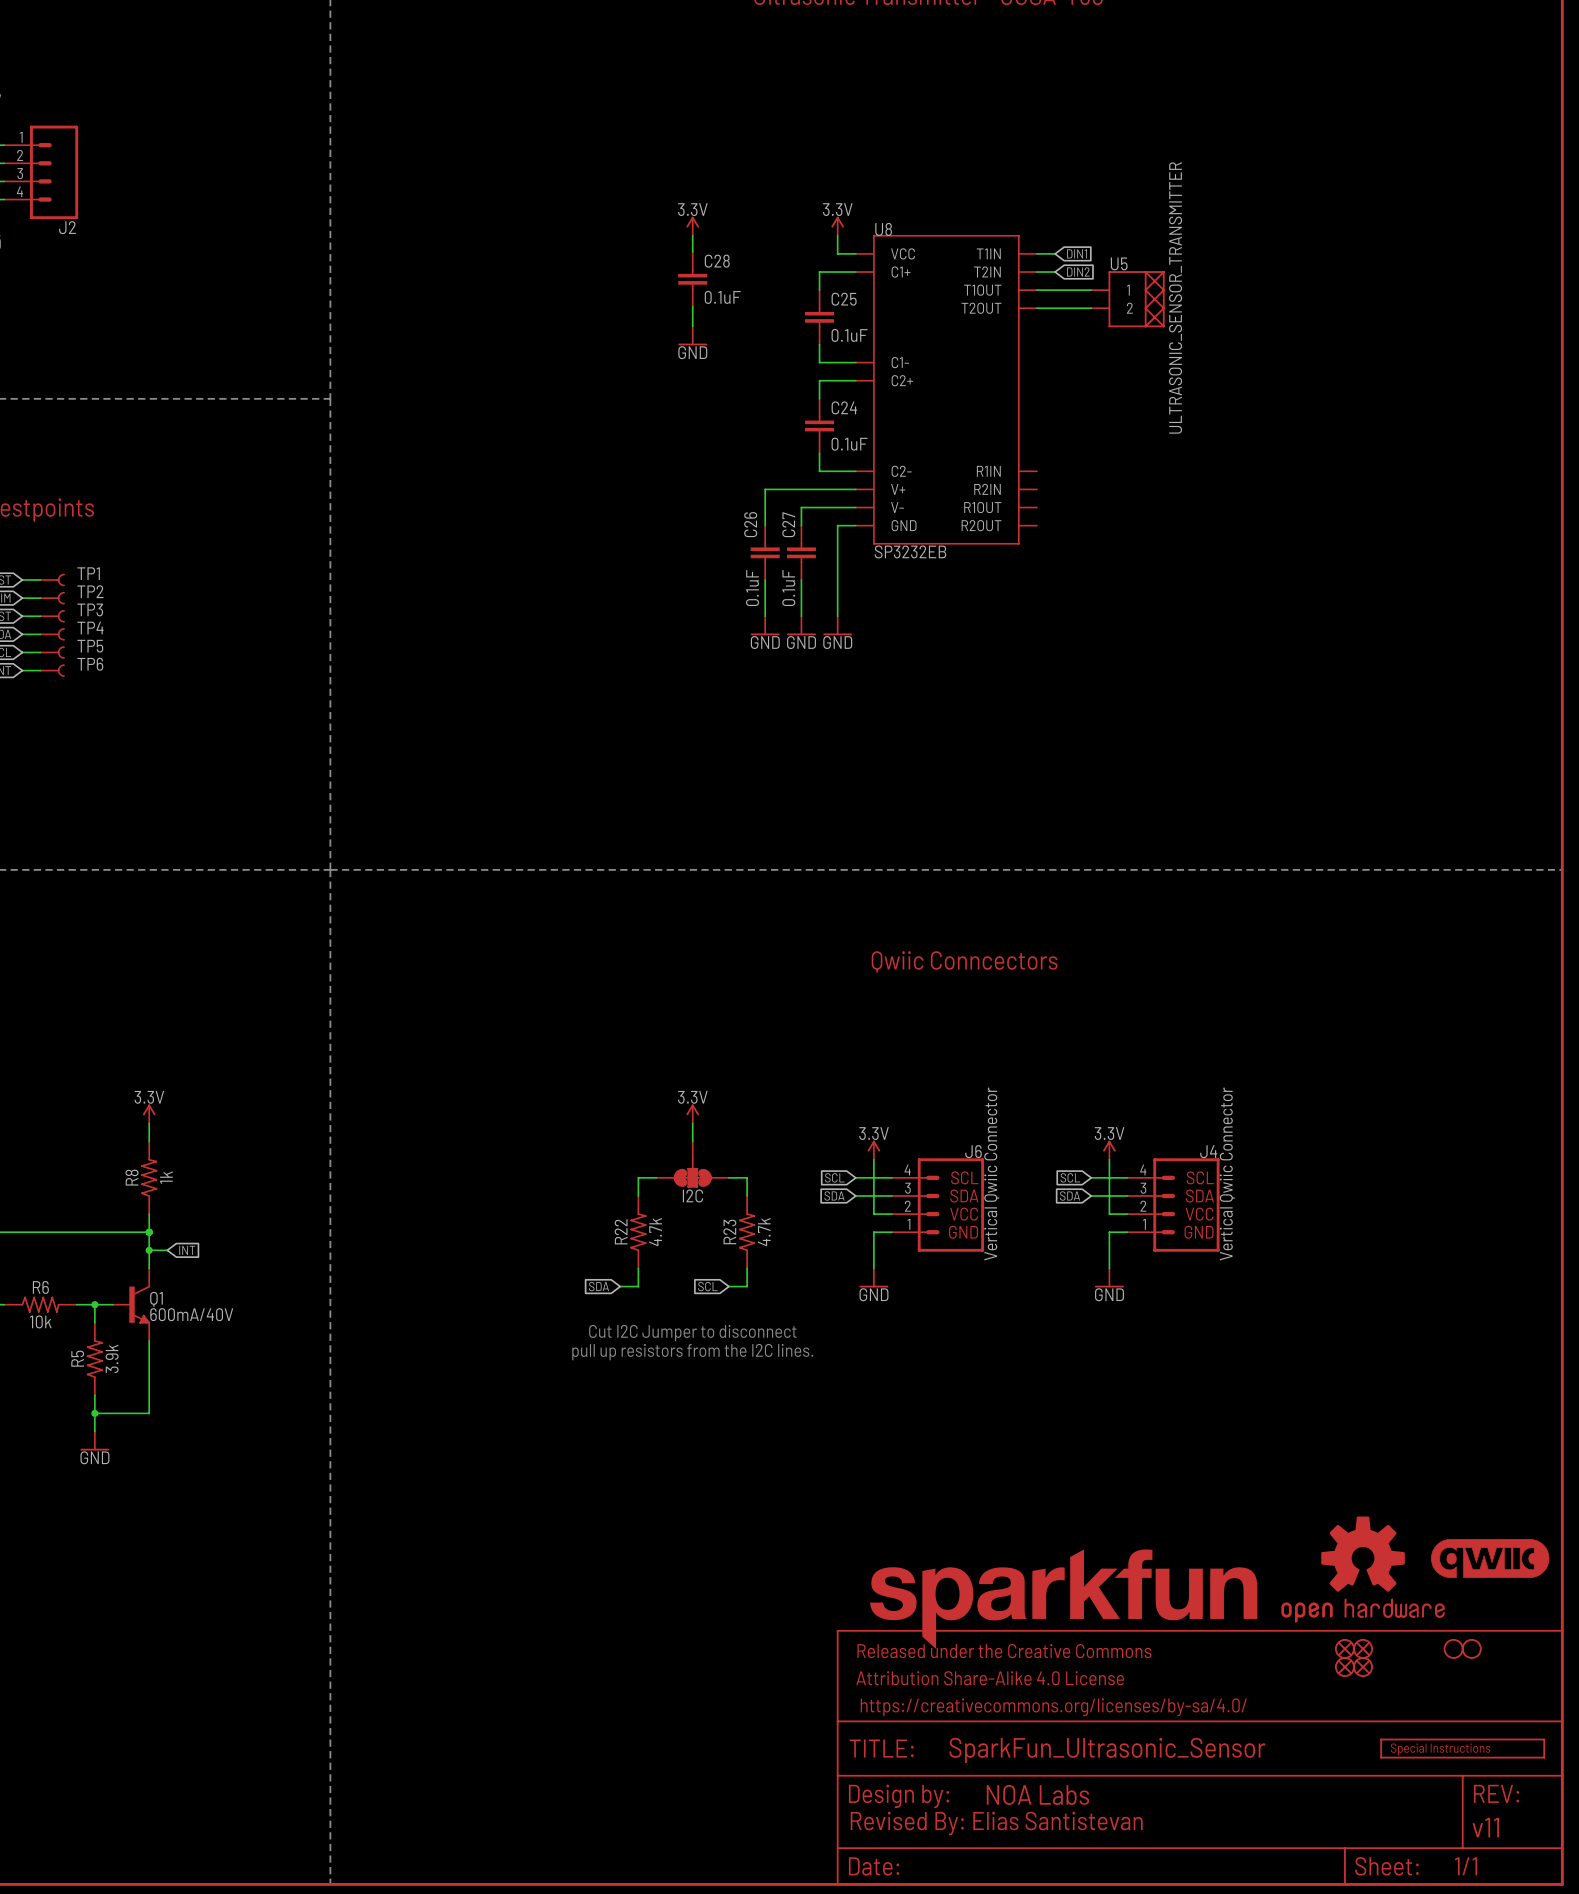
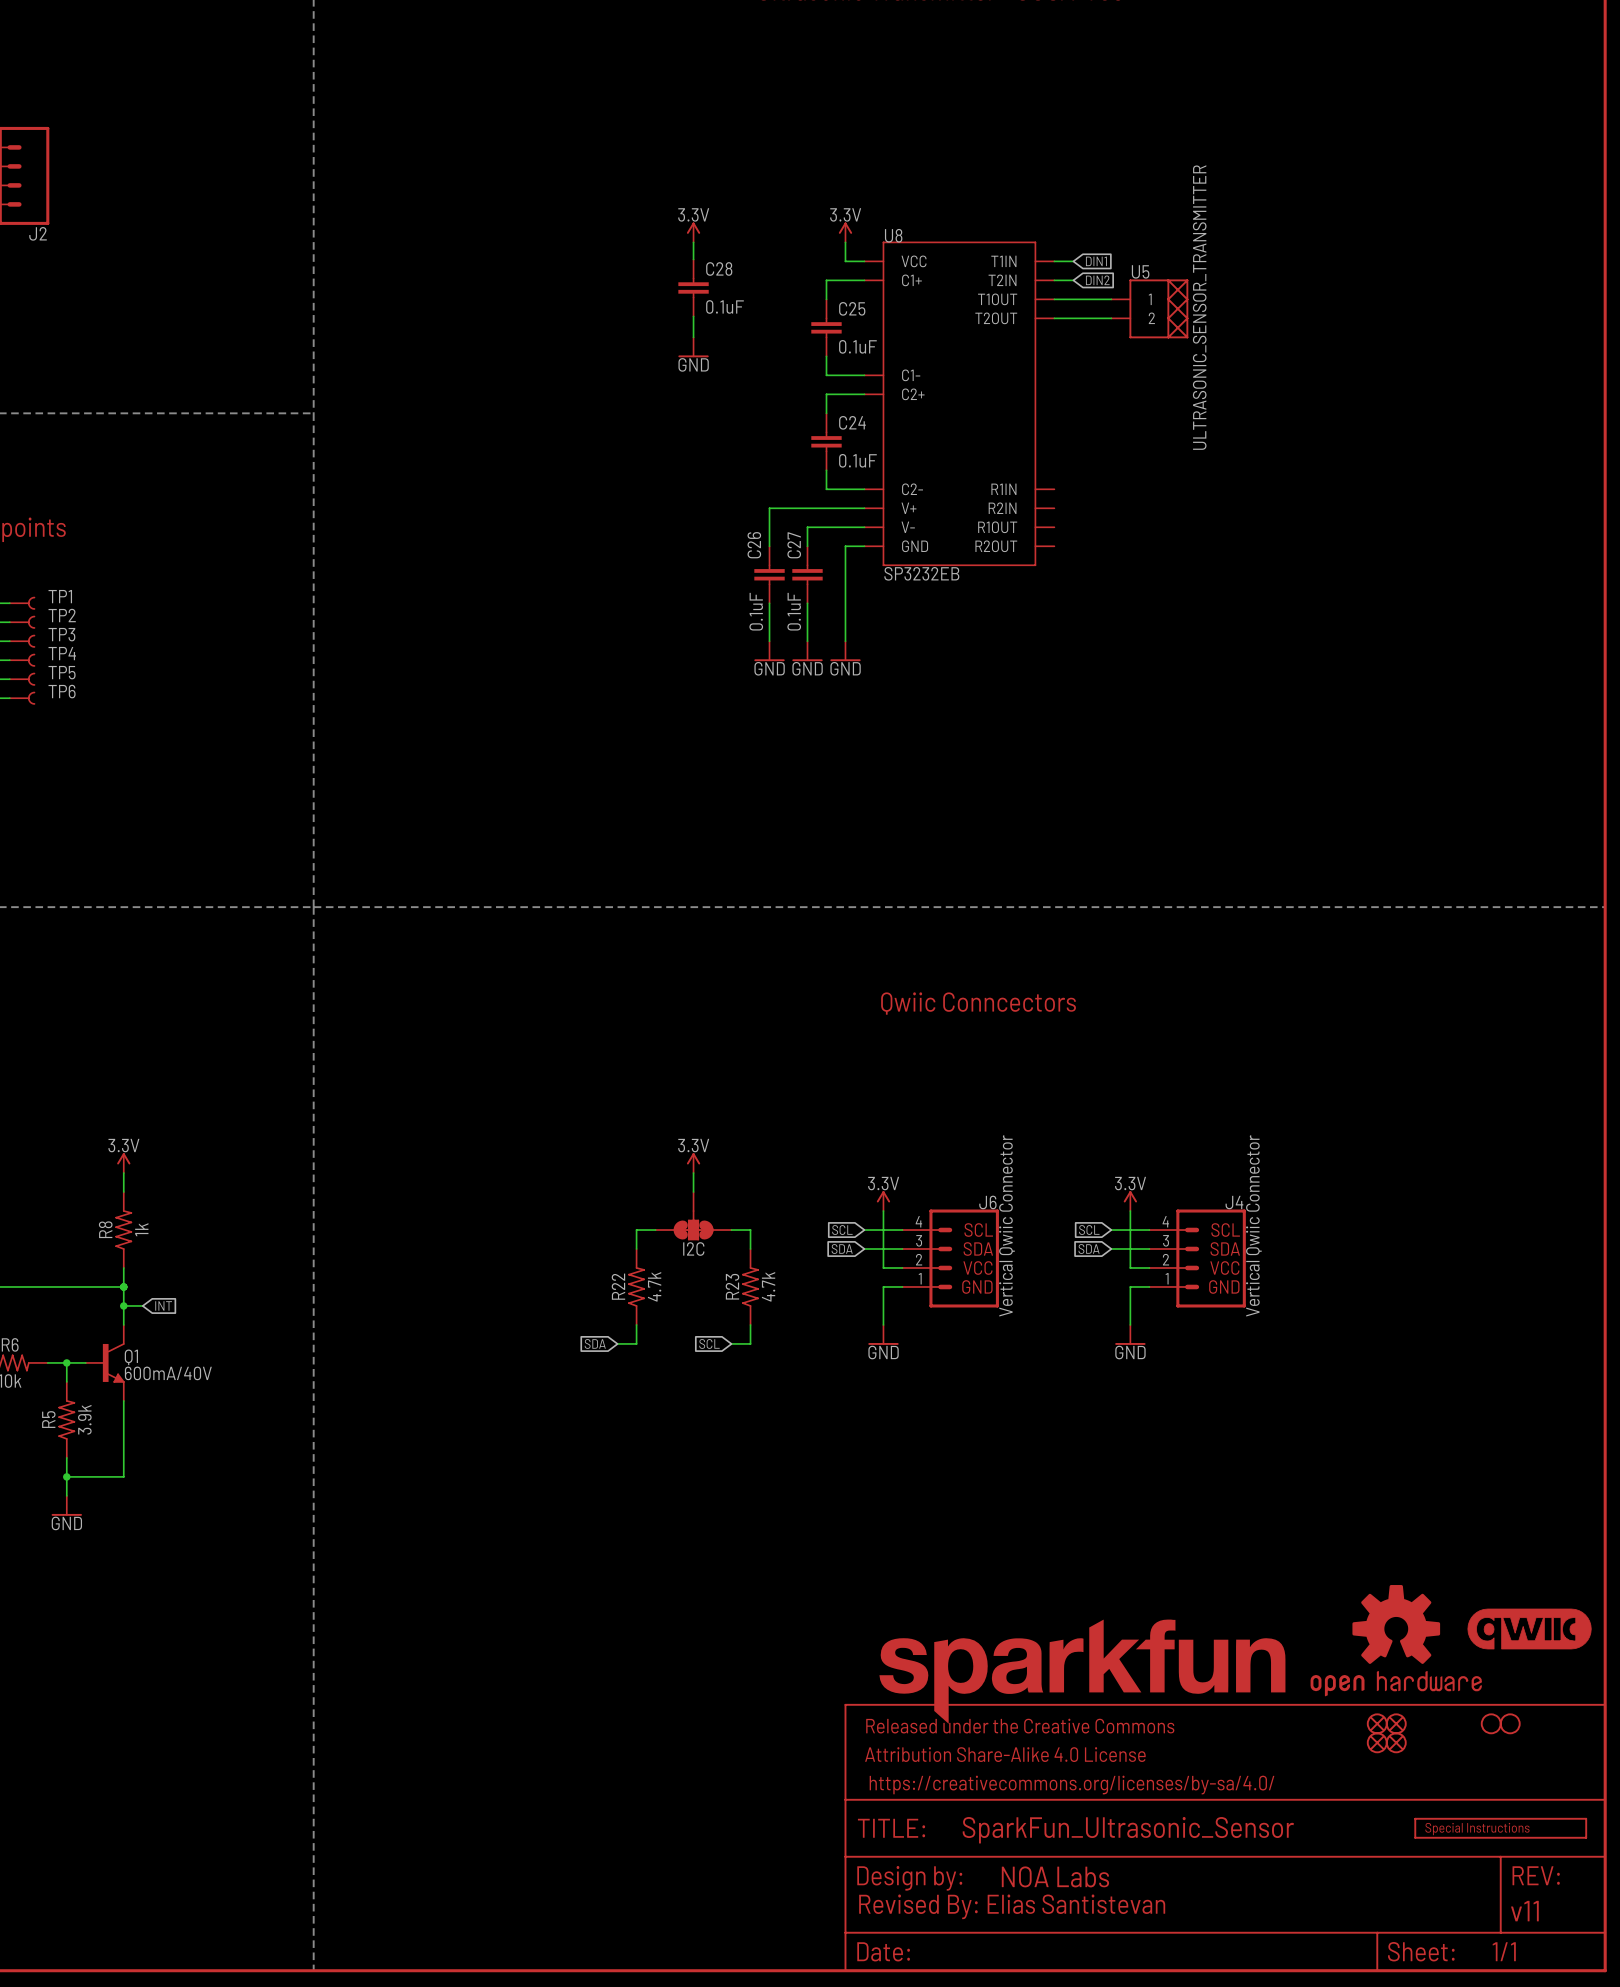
text: Cut I2C Jumper to disconnect (692, 1333) -> none
text: pull up resistors from the I2C lines. (692, 1352) -> none

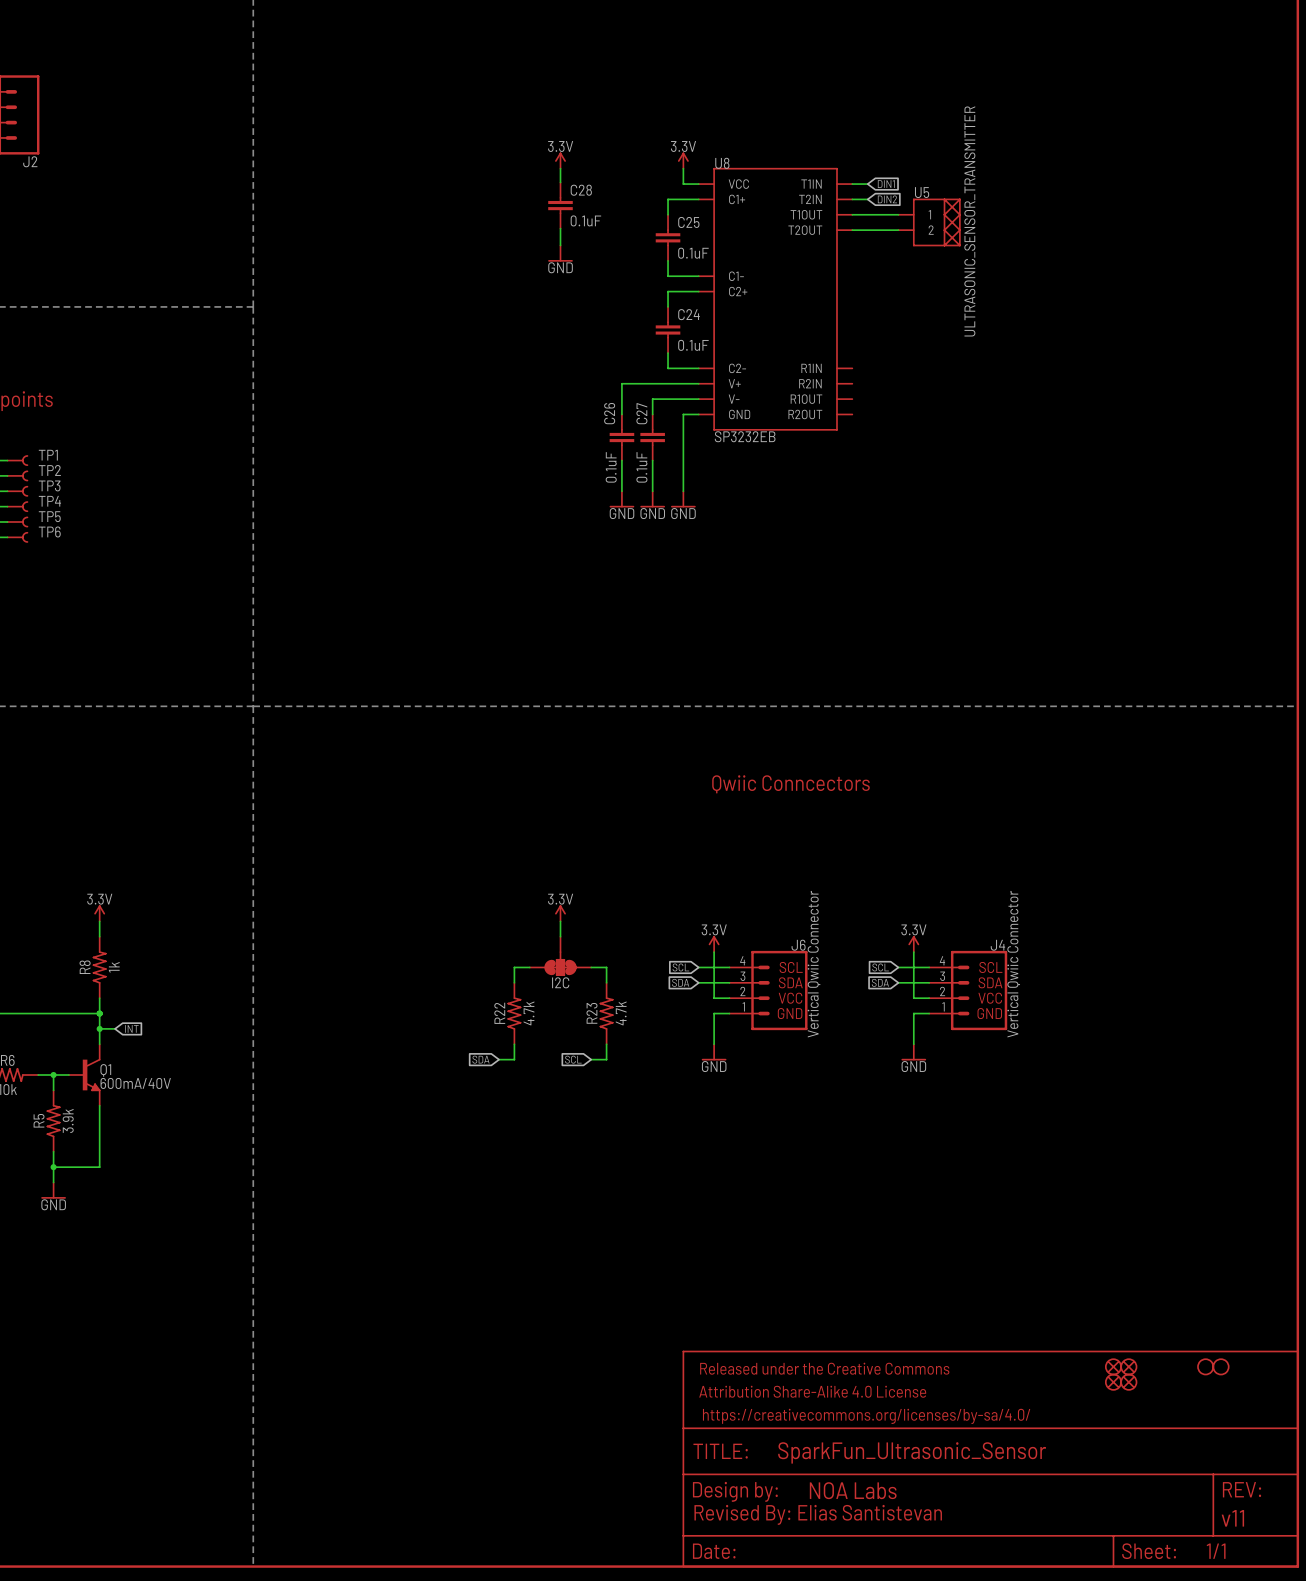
part: (1529, 1629) -> none
part: (1396, 1640) -> none
part: (1082, 1671) -> none
part: (1500, 1828) -> none

